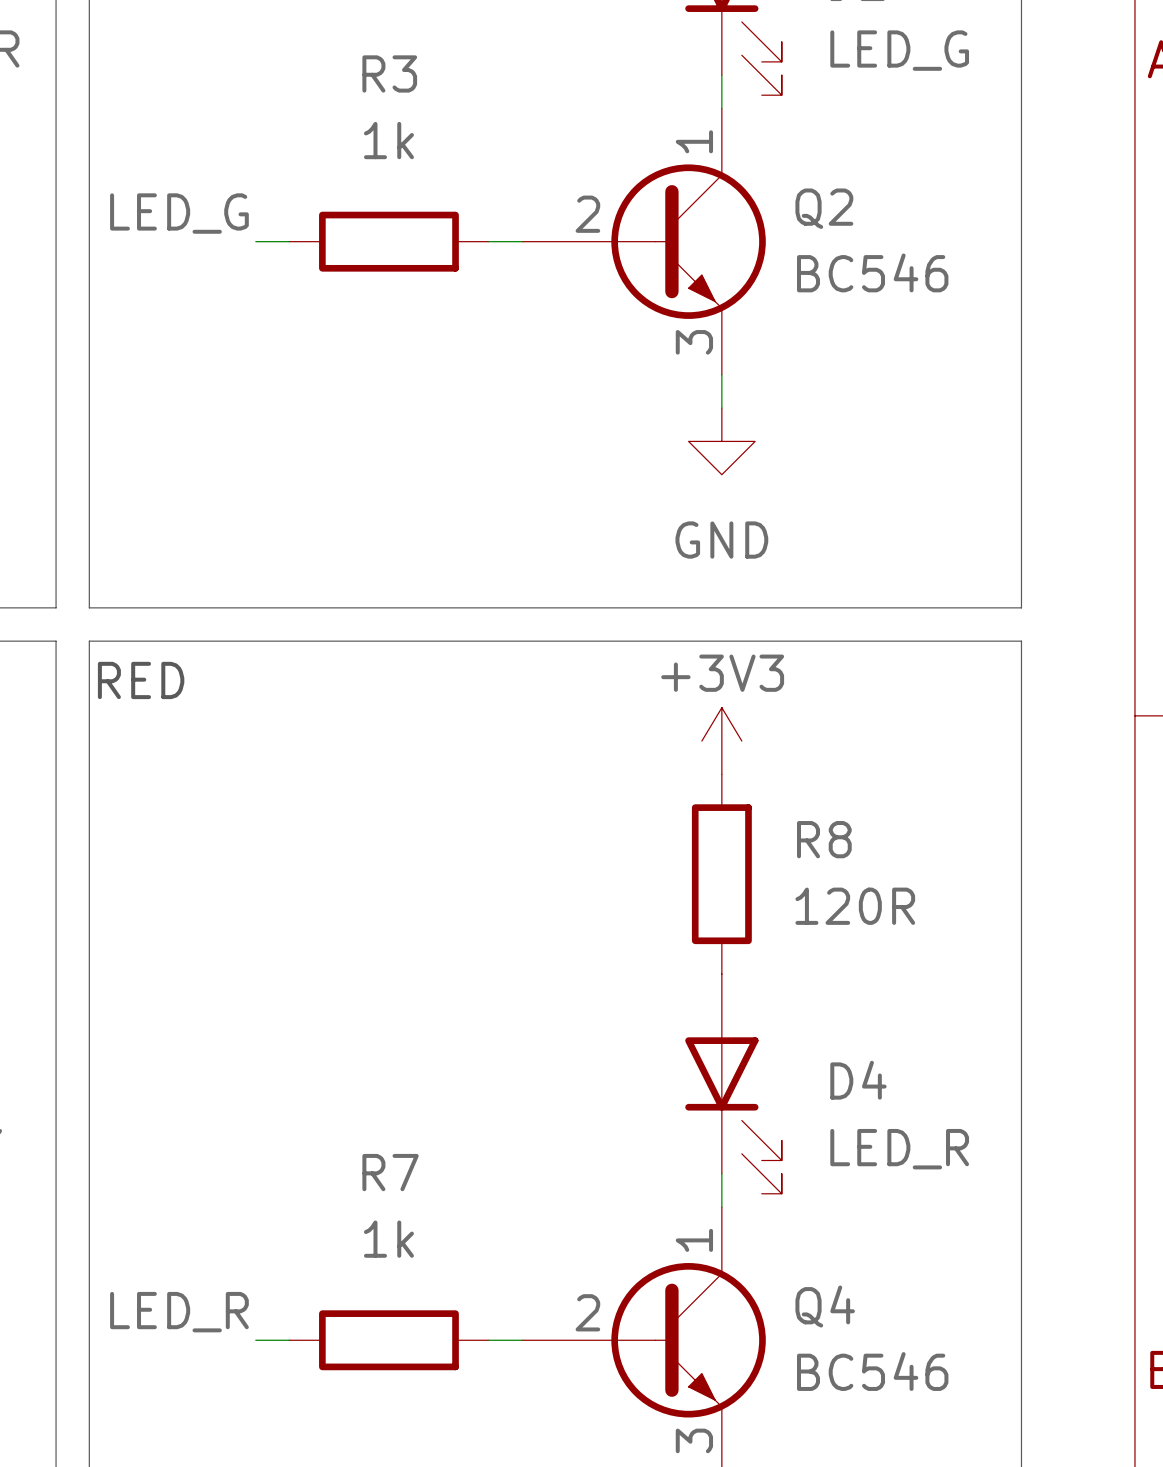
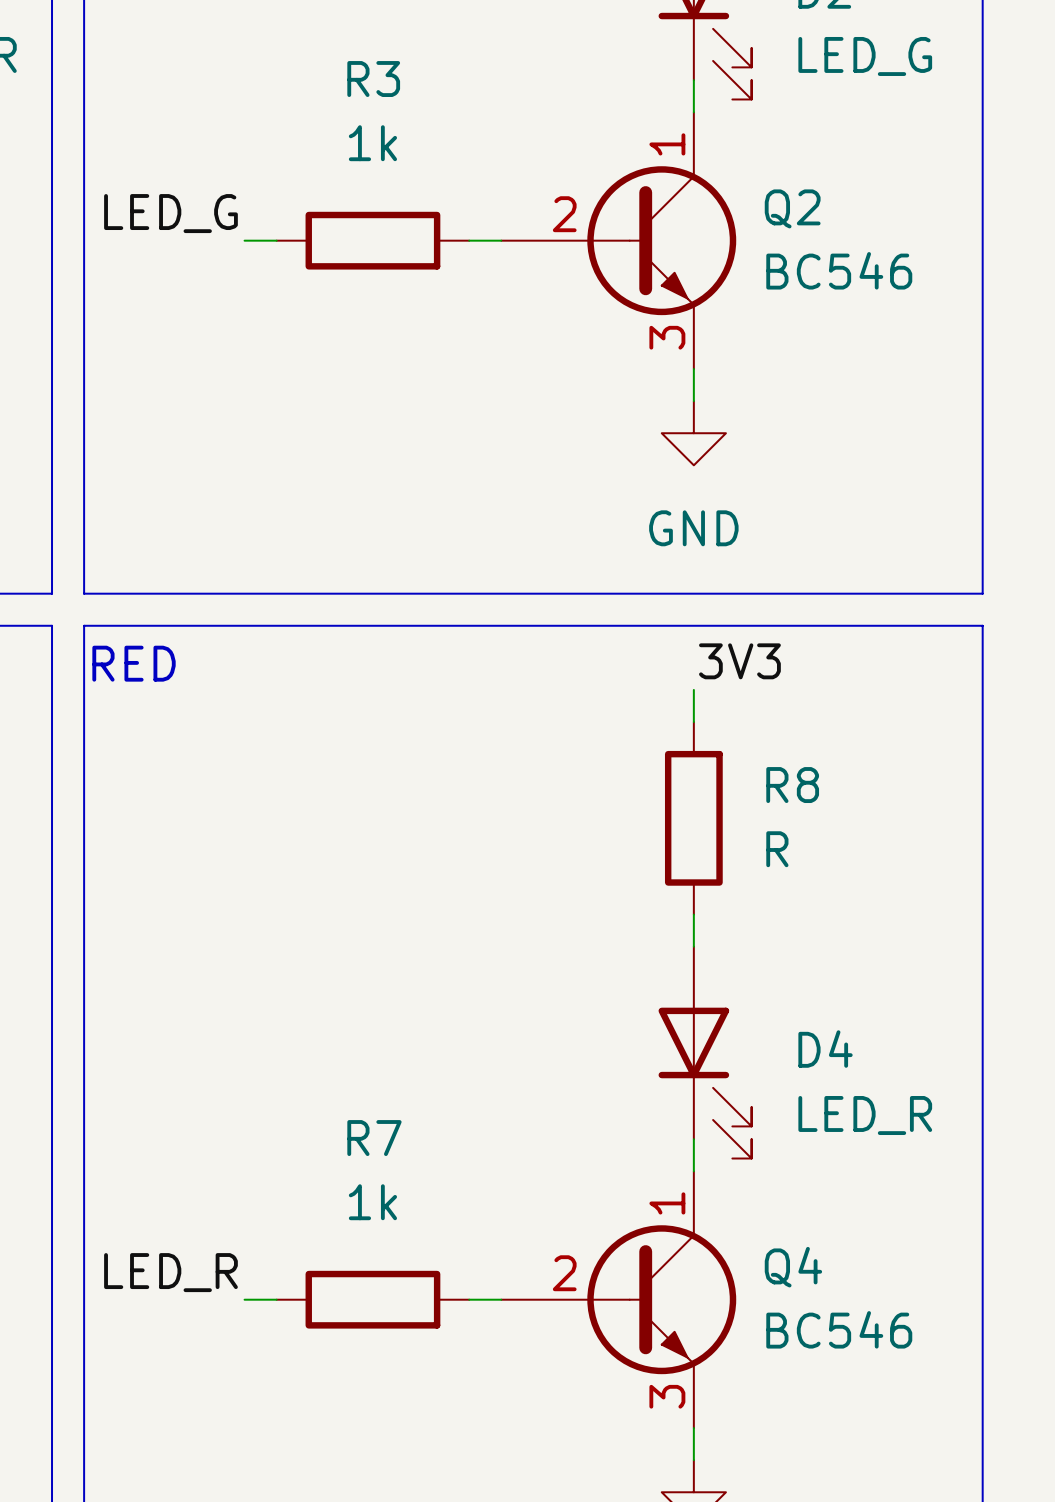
label: none -> 3V3 (739, 661)
power symbol: +3V3 (721, 741) -> none
R8 position: (721, 874) -> (693, 818)
R8 value: 120R (855, 906) -> R (777, 849)

